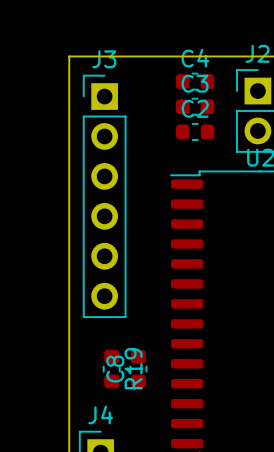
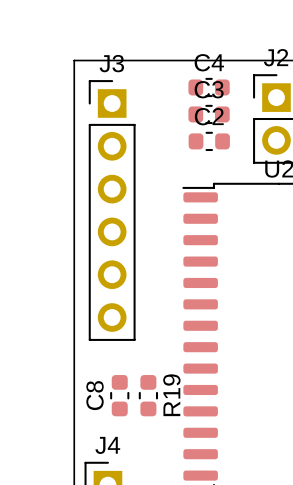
R19 name: R19 (133, 368) -> C8 (95, 395)
C8 name: C8 (115, 369) -> R19 (171, 395)

